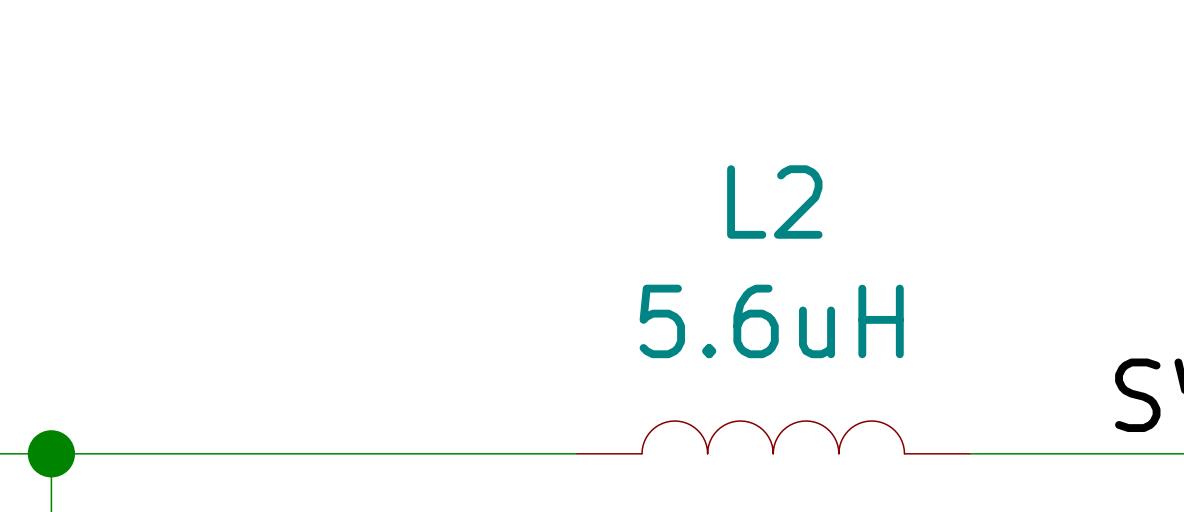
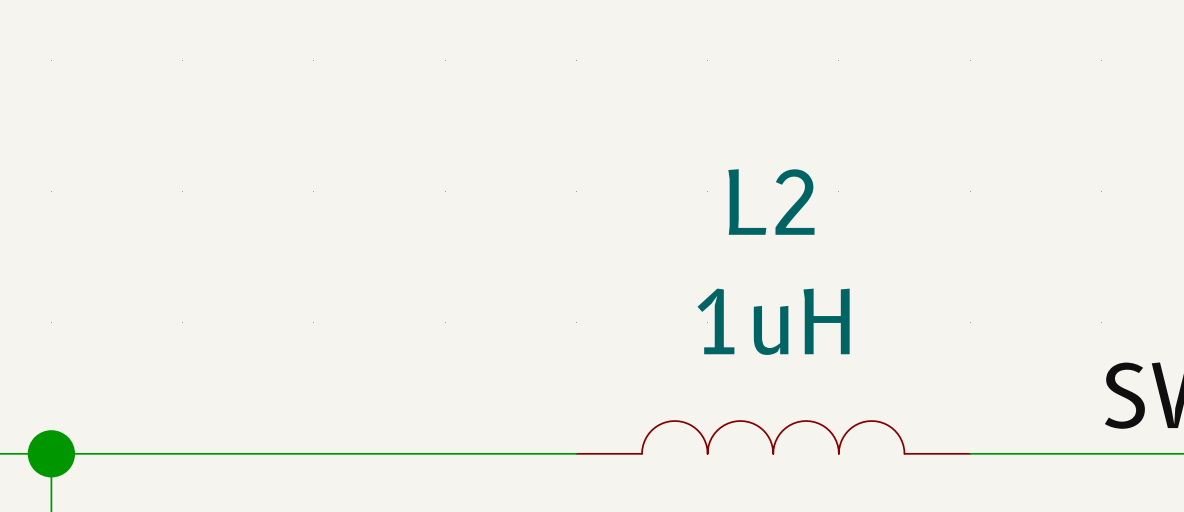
L2 value: 5.6uH (771, 321) -> 1uH (773, 321)

